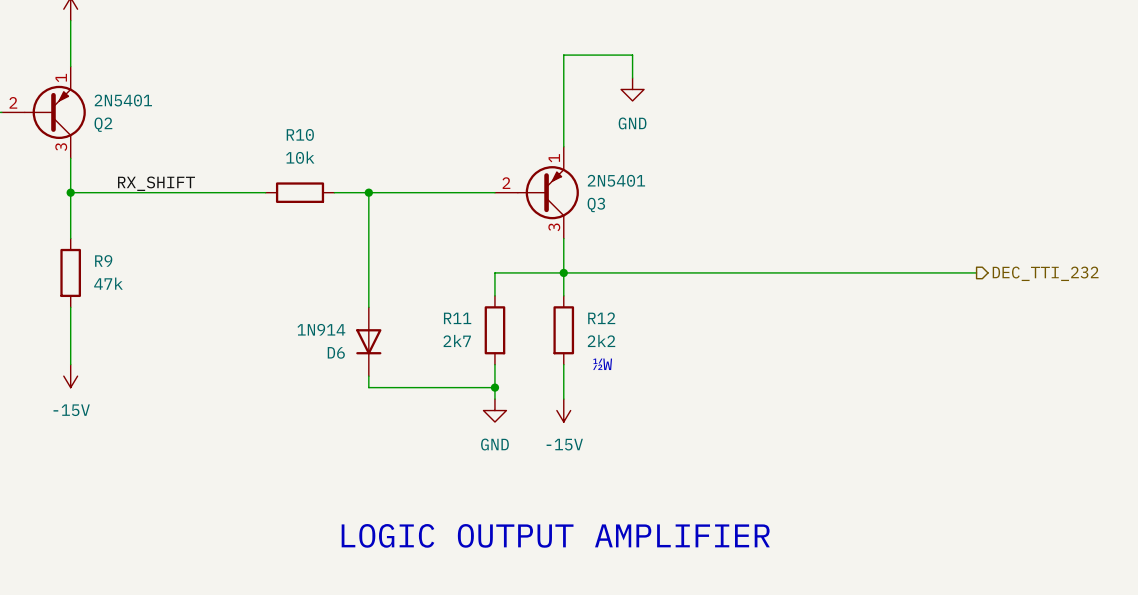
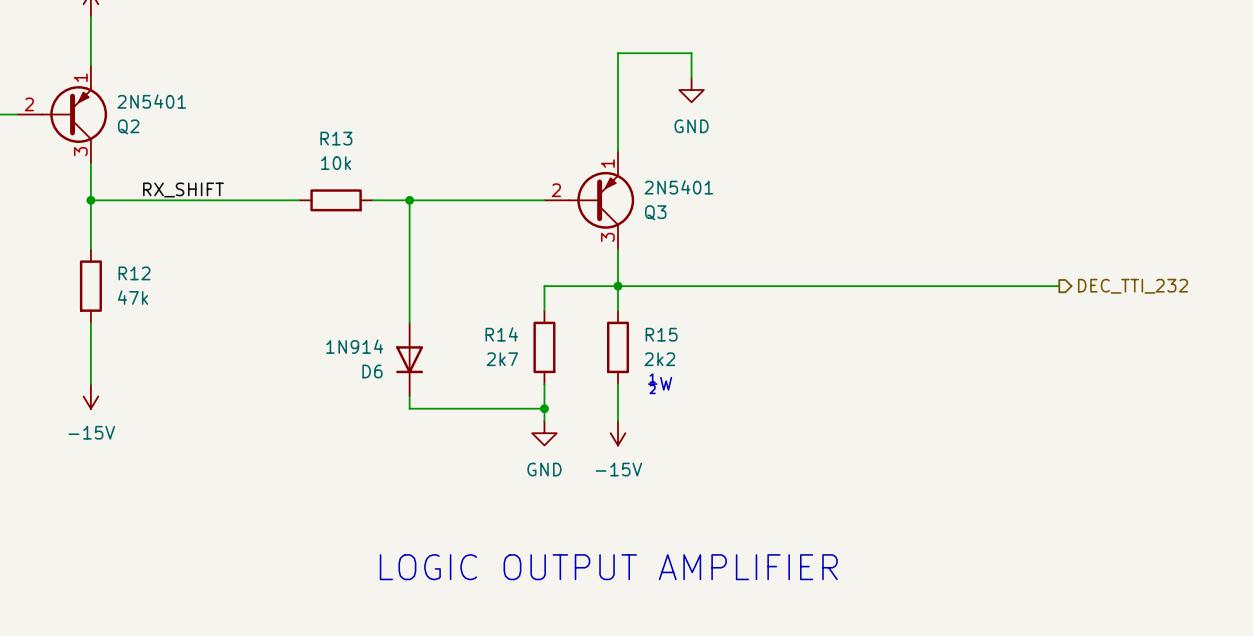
R10 name: R10 (300, 134) -> R13 (336, 138)
R9 name: R9 (103, 260) -> R12 (134, 273)
R11 name: R11 (457, 318) -> R14 (501, 334)
R12 name: R12 (601, 318) -> R15 (661, 334)

